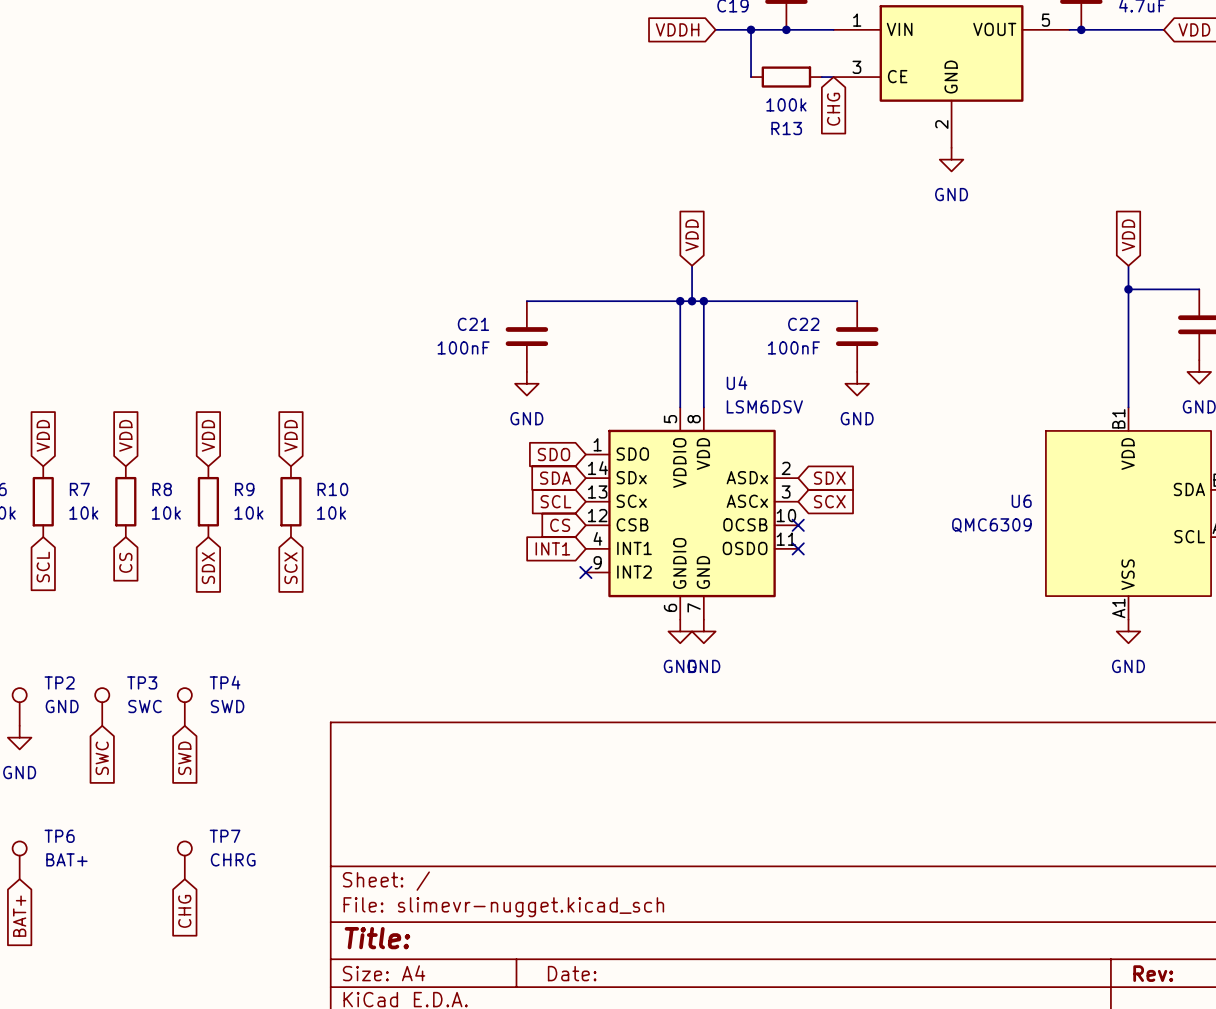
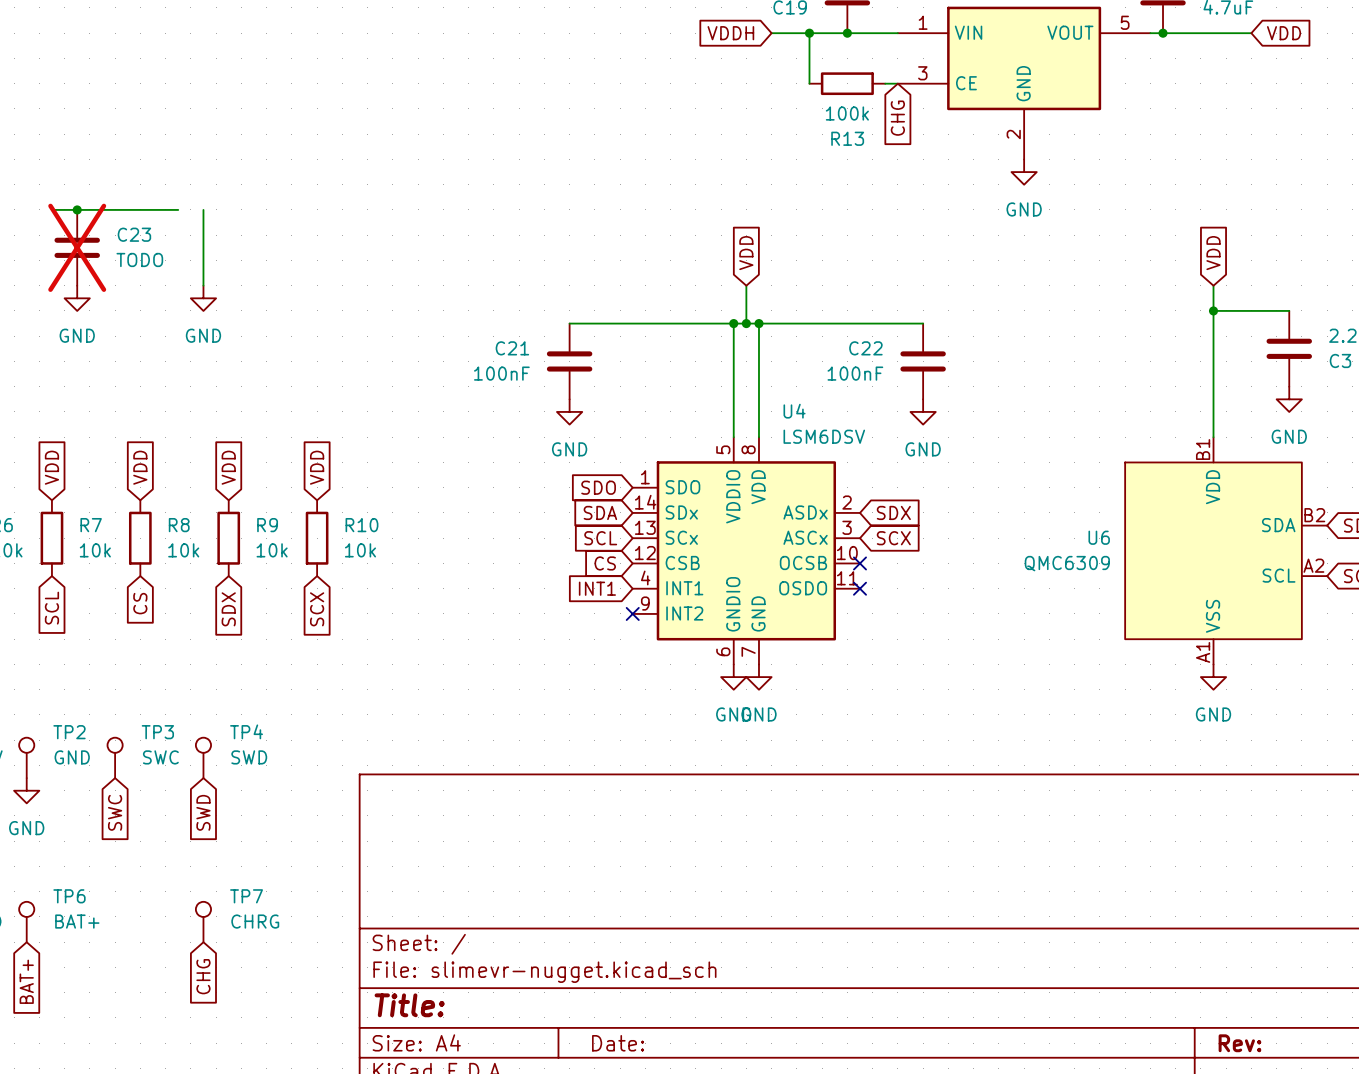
wire: none -> (51, 209) (178, 209)
junction: none -> (77, 209)
wire: none -> (203, 209) (203, 285)
C23: none -> TODO (77, 247)
power symbol: none -> GND (77, 298)
power symbol: none -> GND (203, 298)

